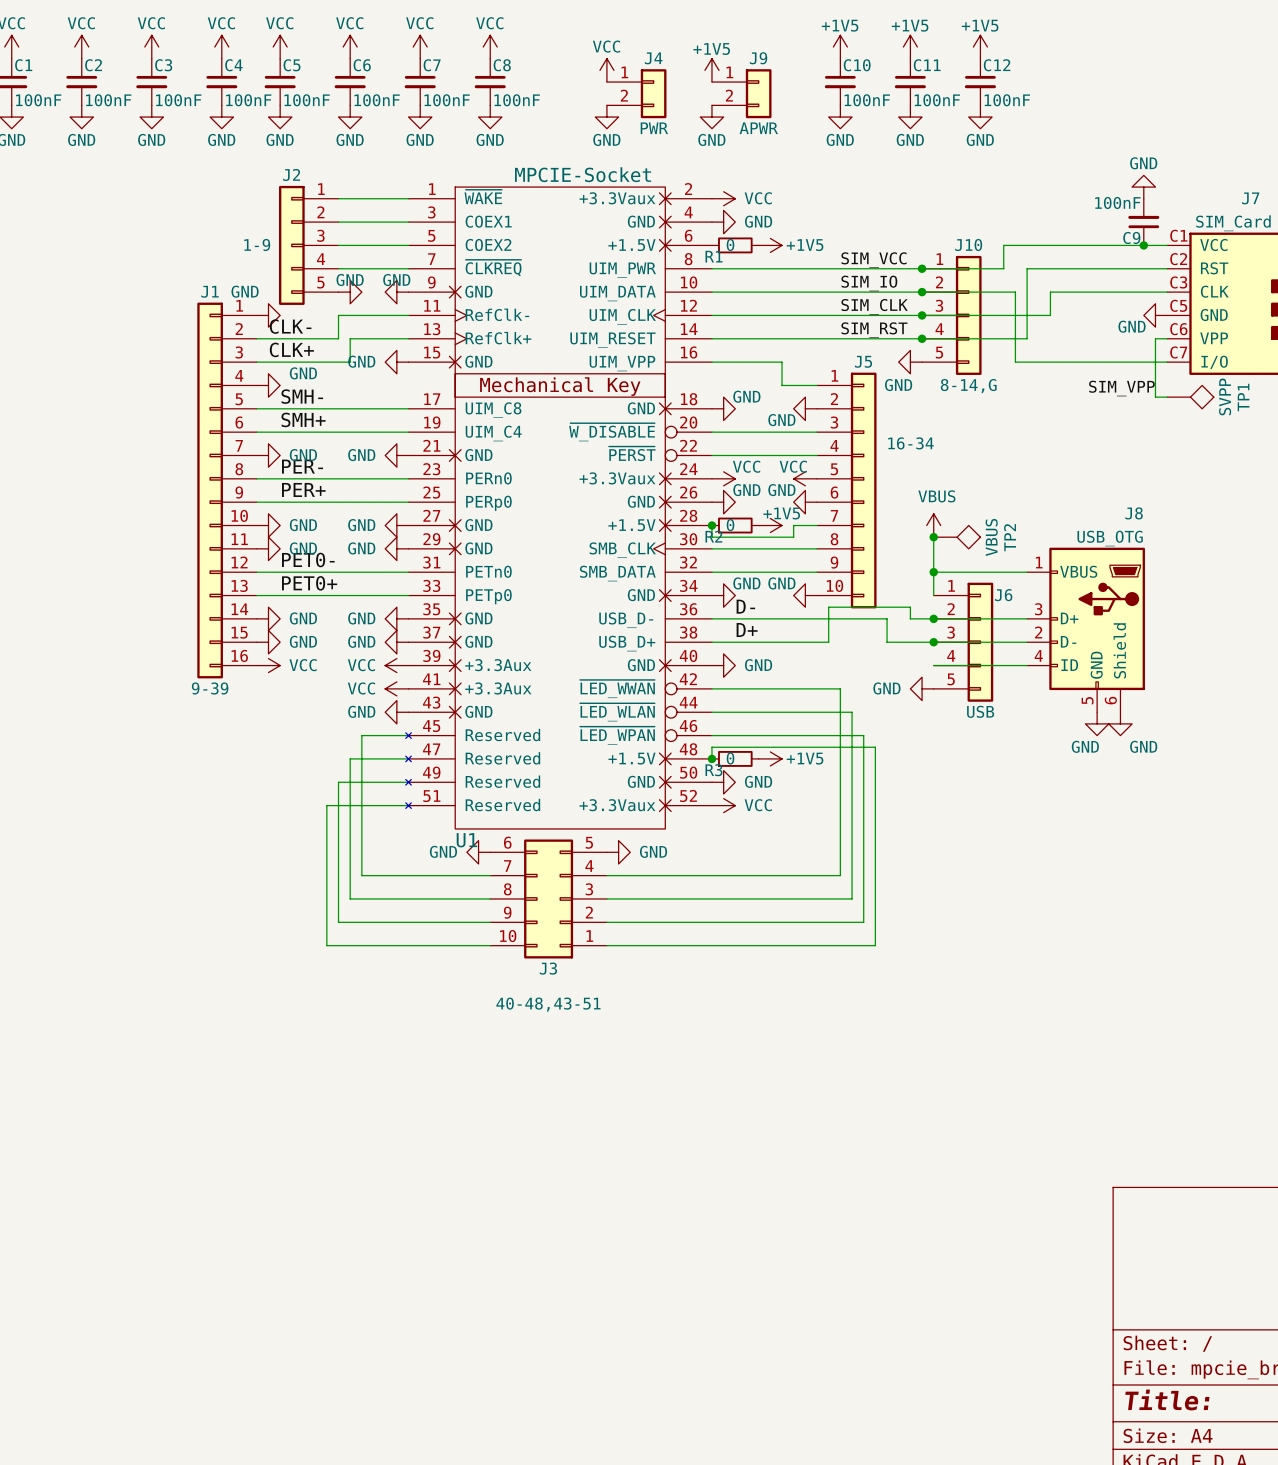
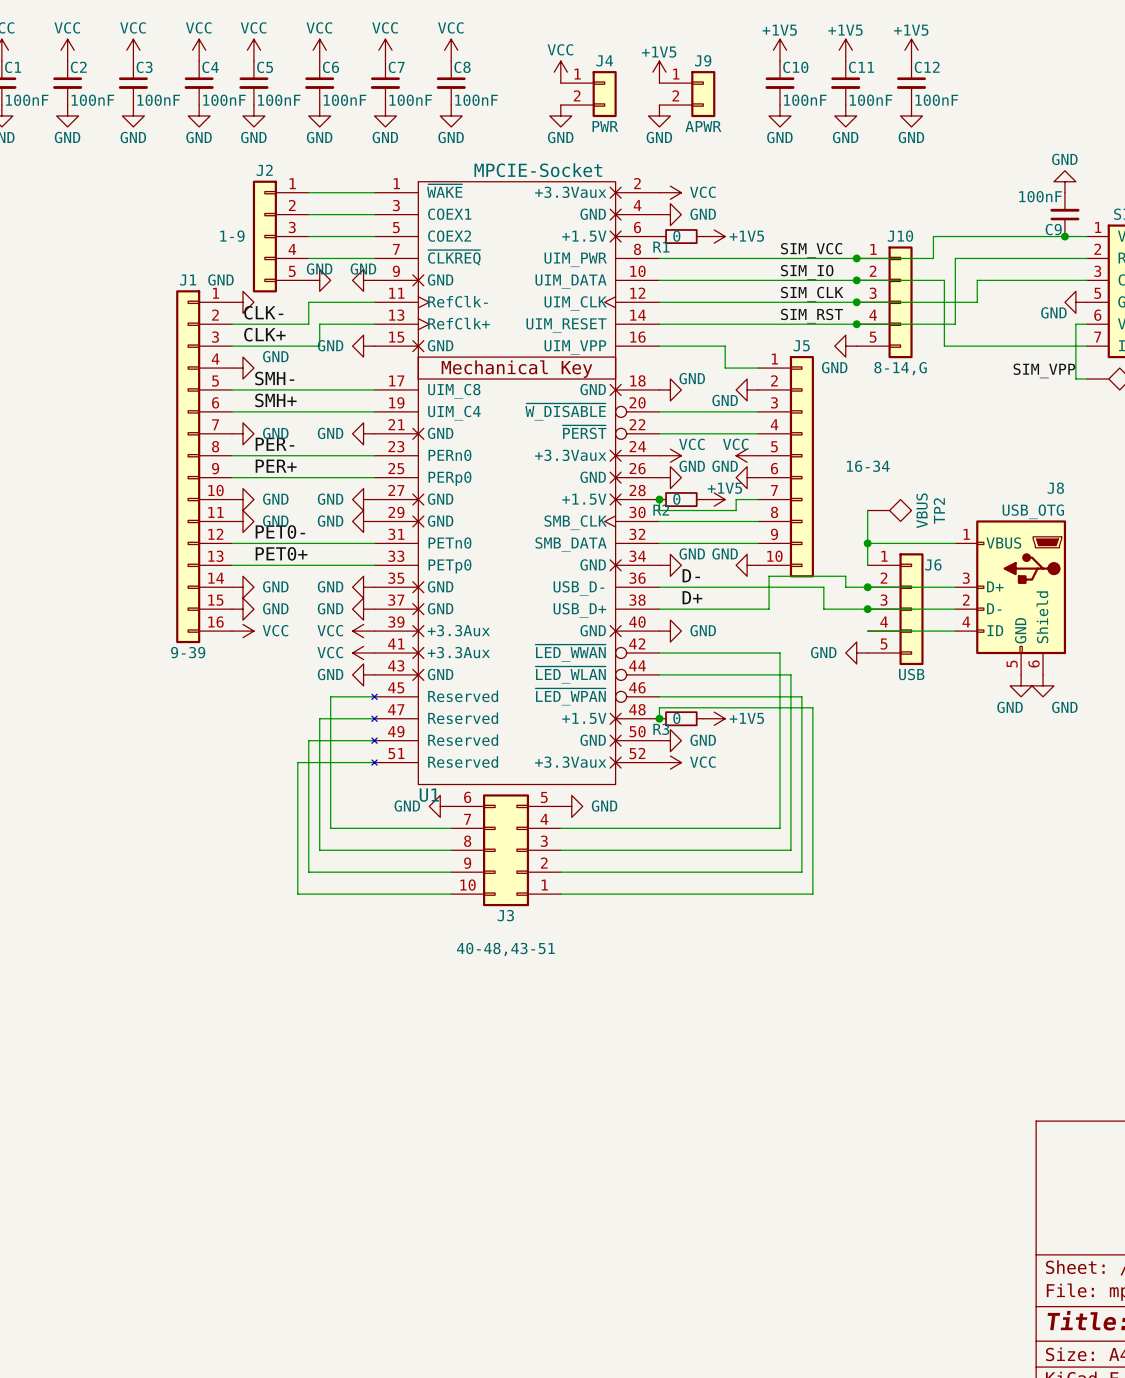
J7 pin number: C1 (1178, 235) -> 1 (1098, 227)
J7 pin number: C2 (1178, 259) -> 2 (1097, 249)
J7 pin number: C3 (1178, 282) -> 3 (1097, 271)
J7 pin number: C5 (1178, 305) -> 5 (1097, 293)
J7 pin number: C6 (1178, 329) -> 6 (1097, 315)
J7 pin number: C7 (1178, 352) -> 7 (1097, 337)
J5 value position: 16-34 (910, 443) -> 16-34 (868, 466)
power symbol: VBUS (933, 525) -> none
junction: (933, 537) -> none

